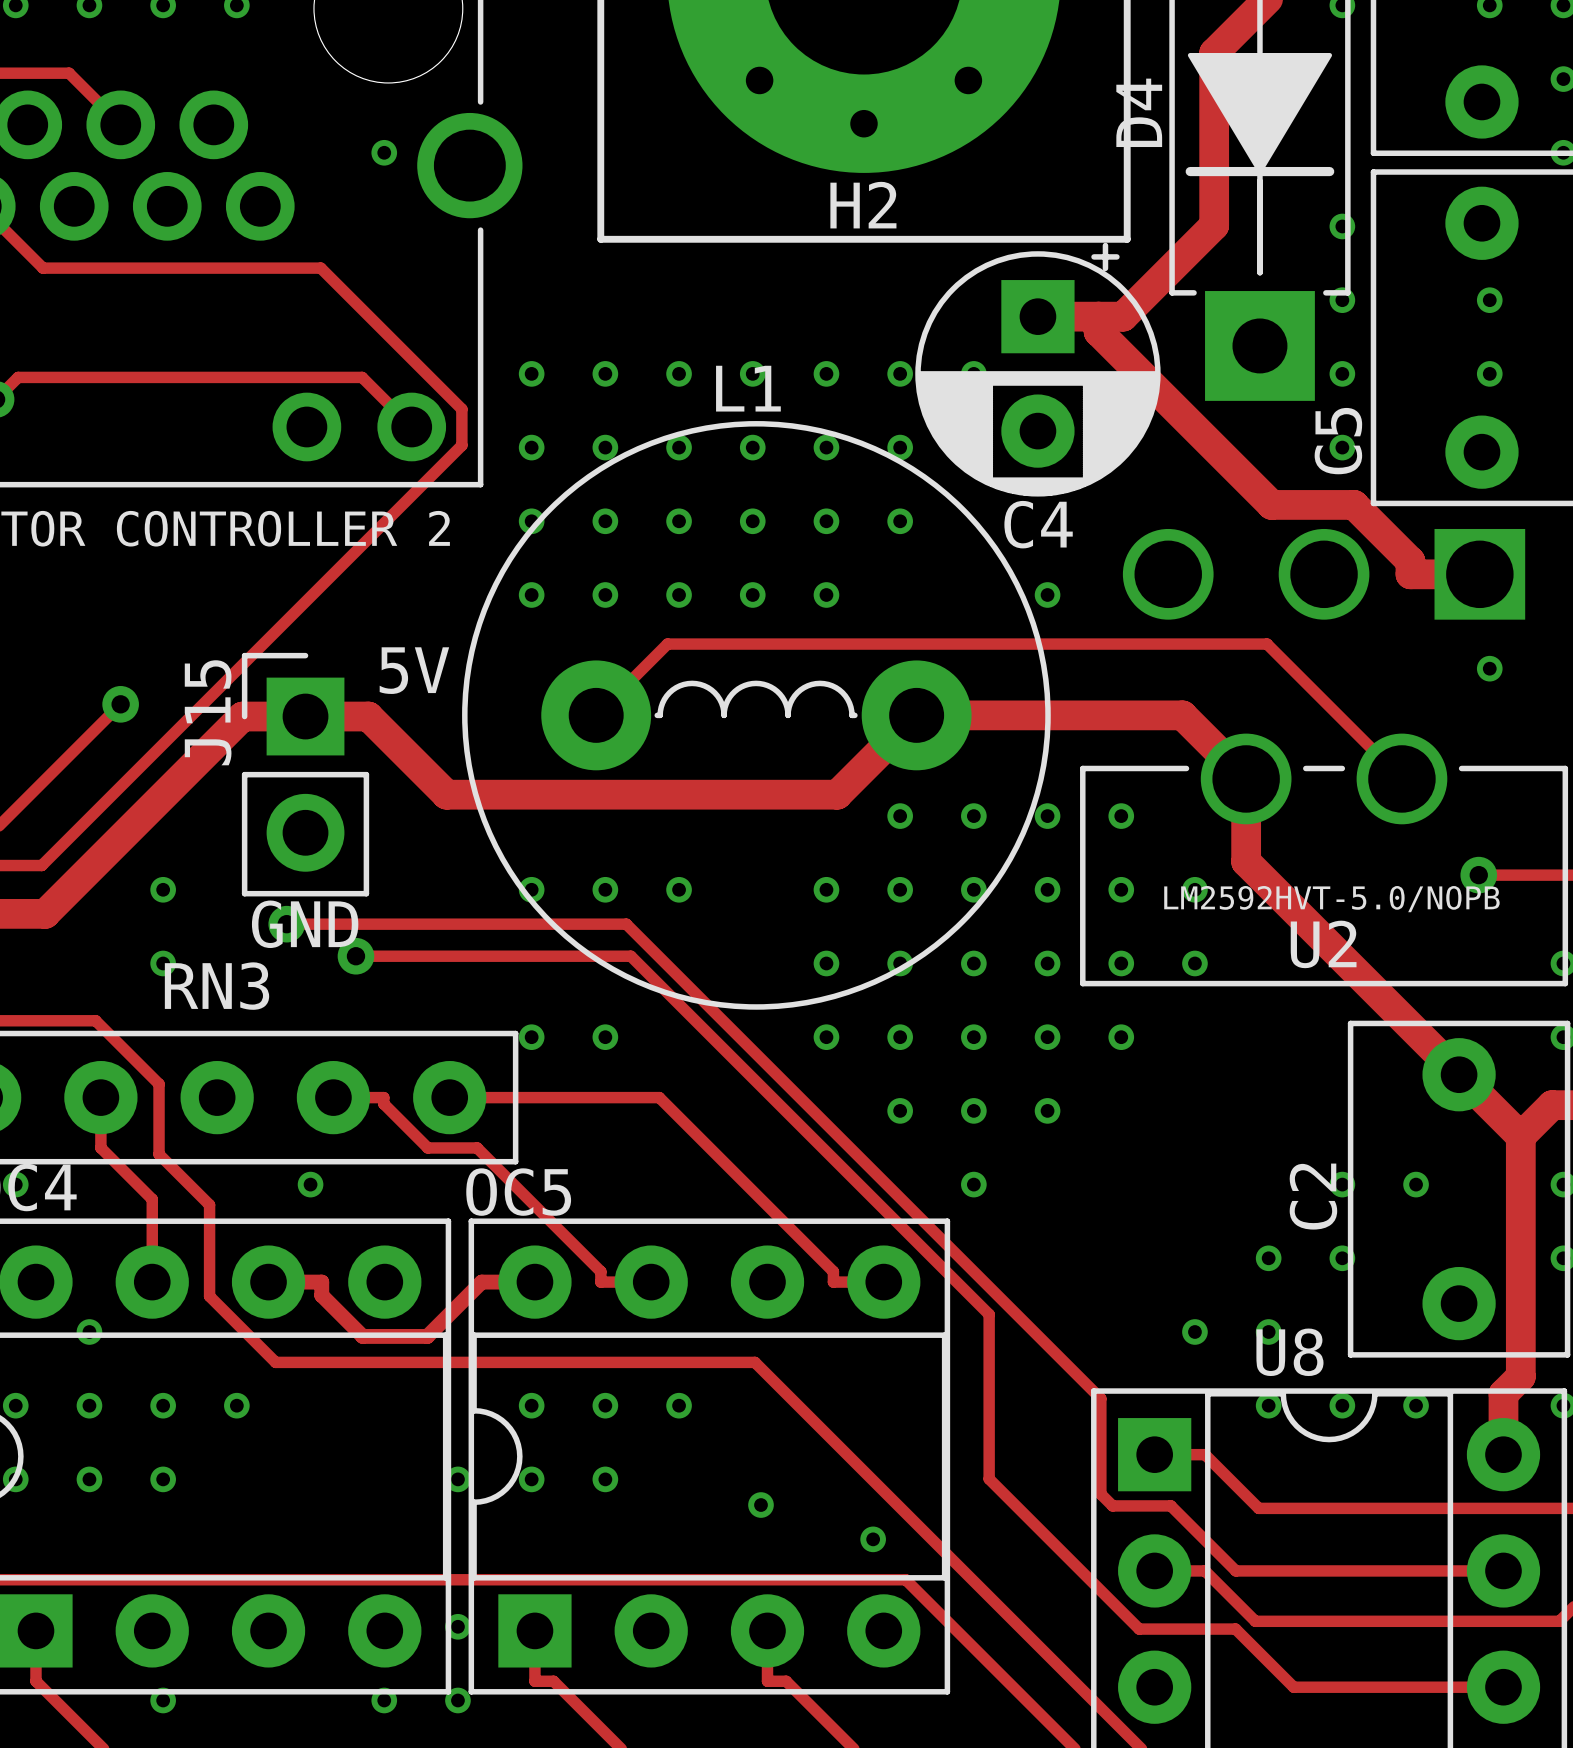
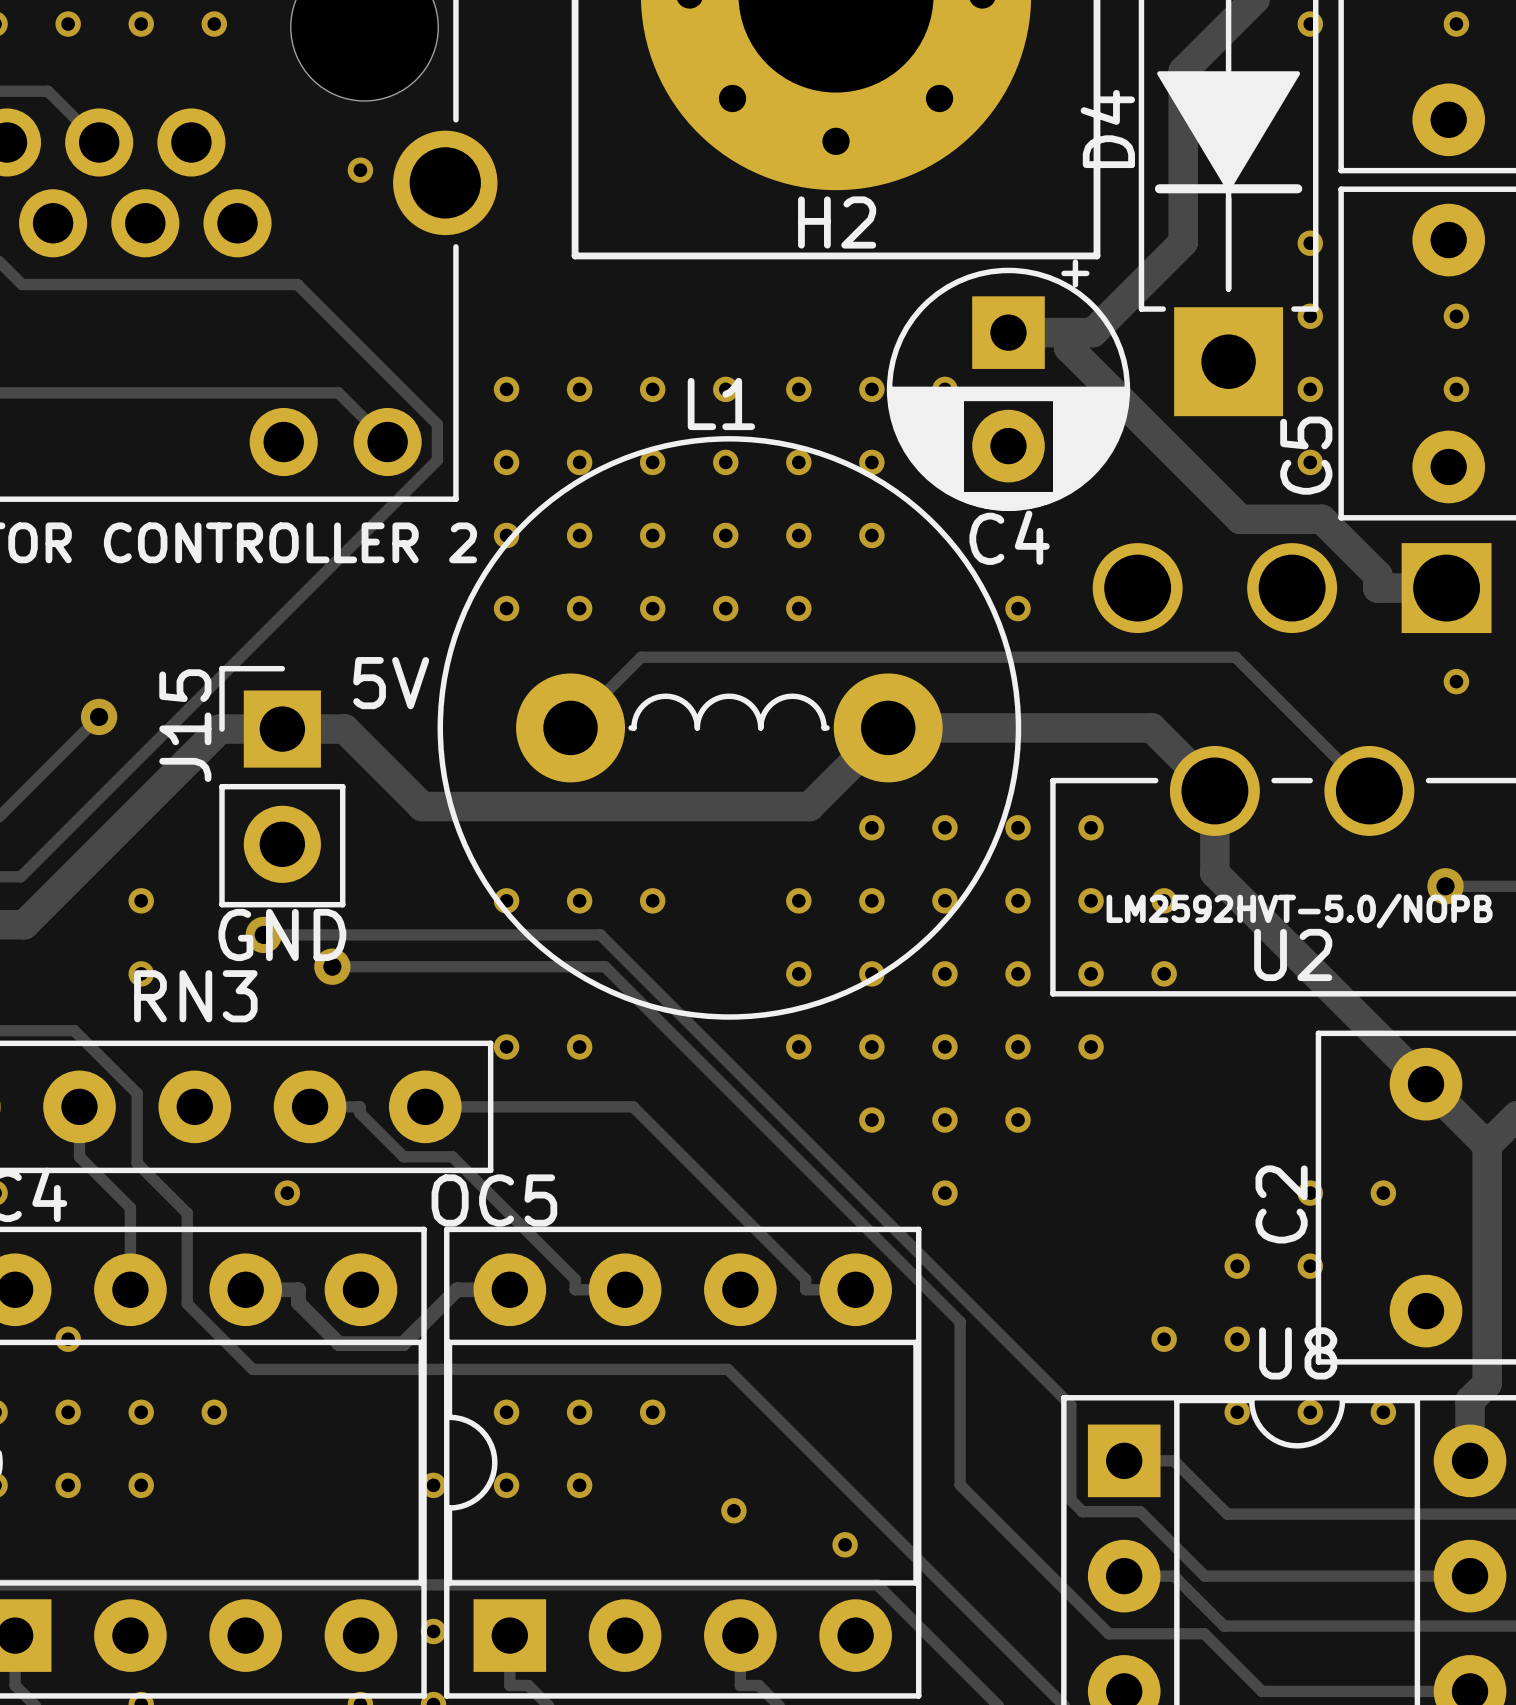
U8 name position: U8 (1289, 1352) -> U8 (1298, 1353)

